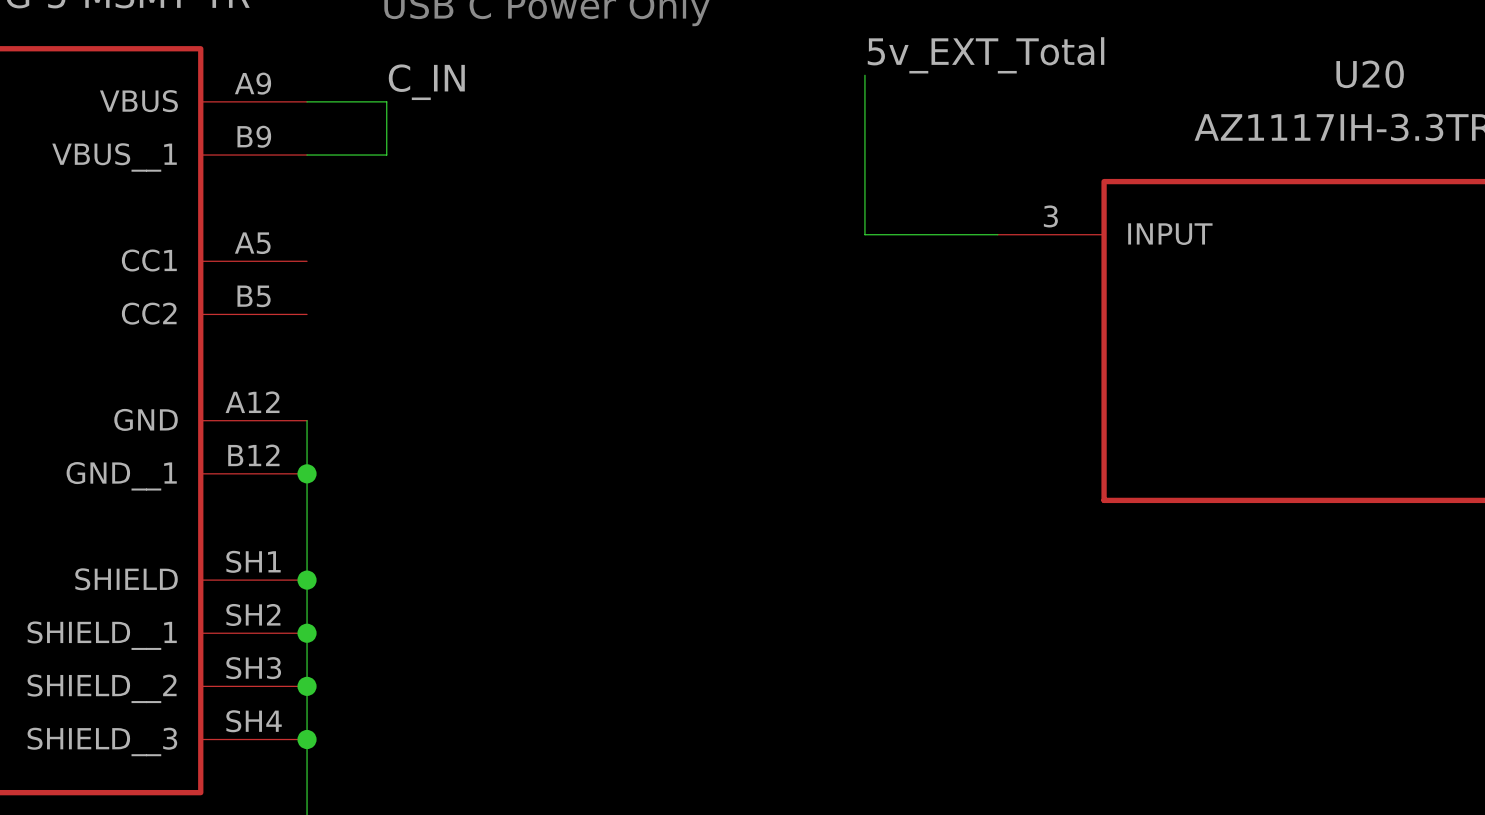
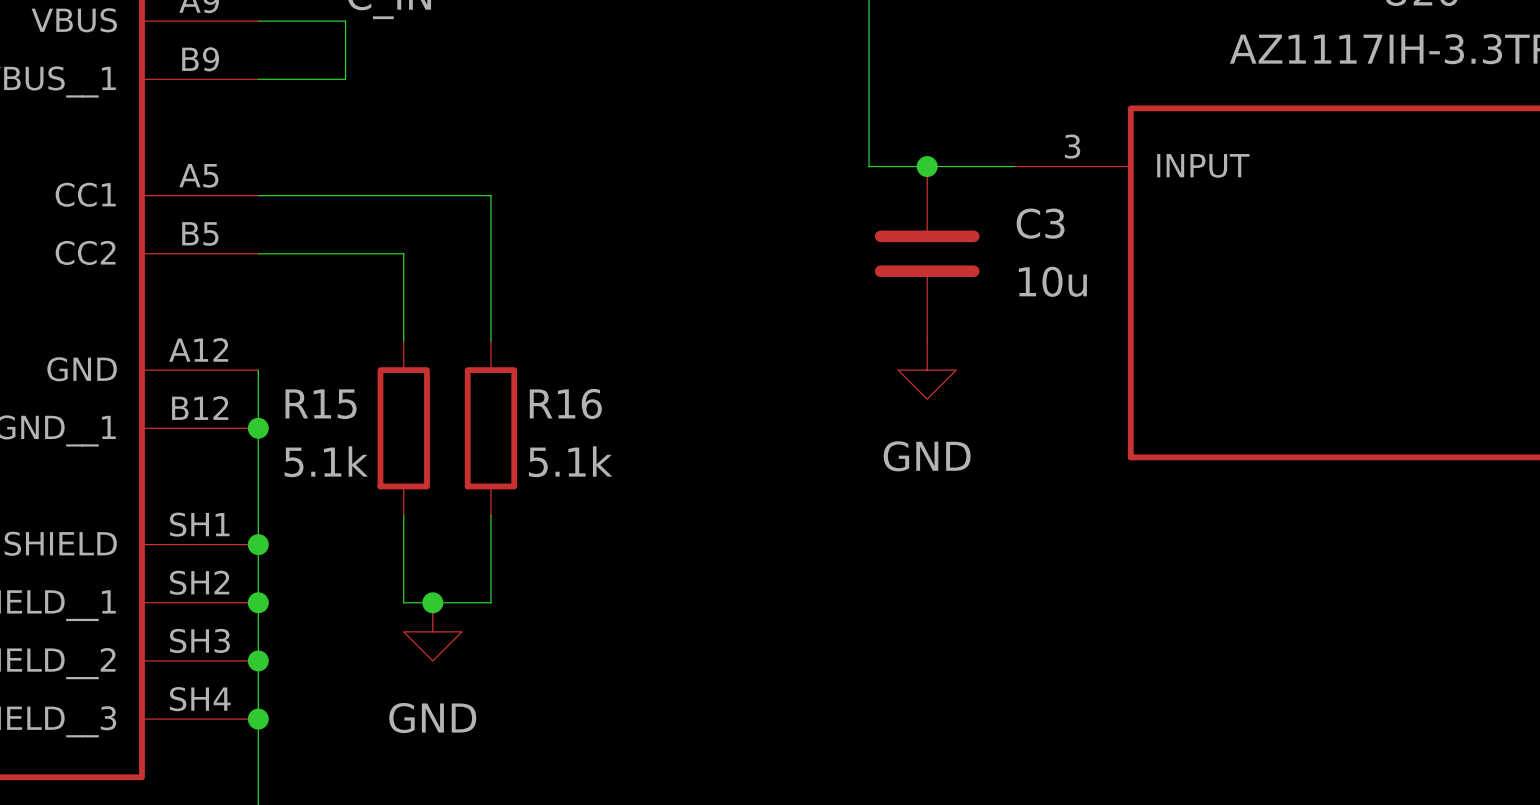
junction: none -> (927, 166)
wire: none -> (258, 195) (490, 195) (490, 341)
wire: none -> (258, 253) (403, 253) (403, 341)
C3: none -> 10u (927, 253)
power symbol: none -> GND (927, 370)
R15: none -> 5.1k (403, 428)
R16: none -> 5.1k (490, 428)
wire: none -> (403, 515) (403, 602) (490, 602) (490, 515)
junction: none -> (432, 602)
power symbol: none -> GND (432, 631)

